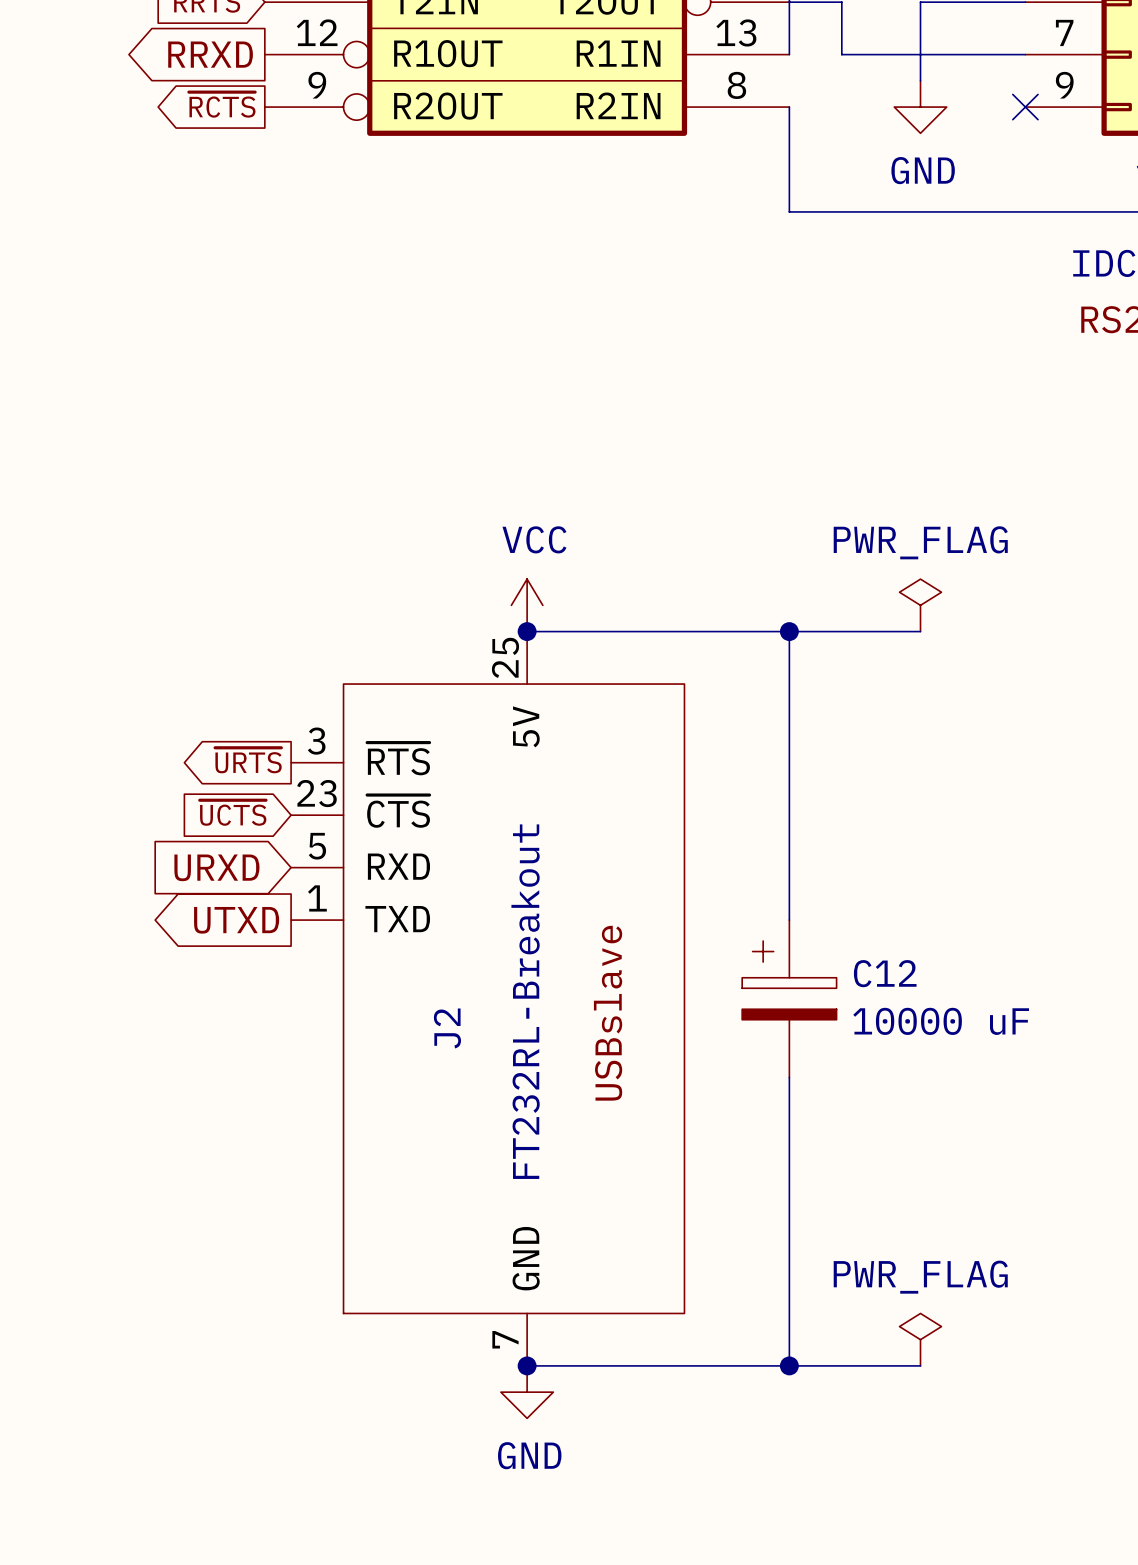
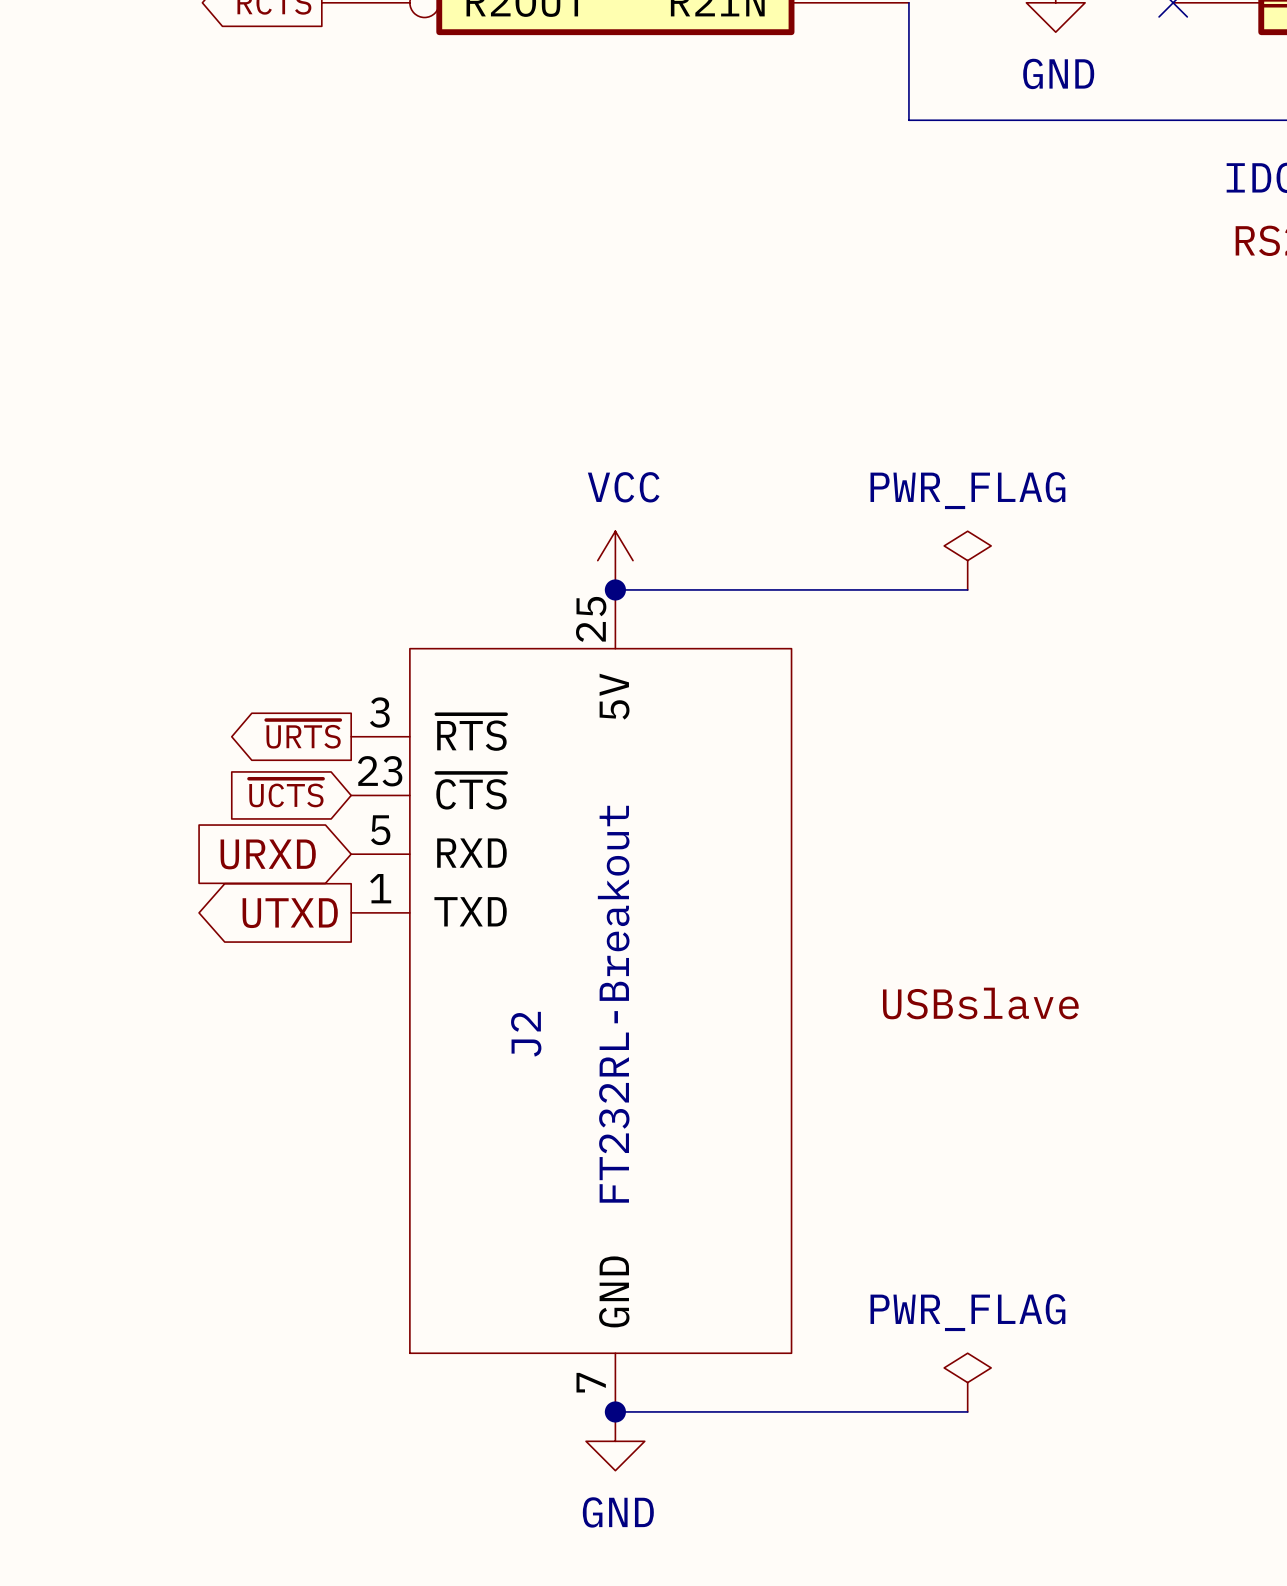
power symbol position: PWR_FLAG (920, 605) -> PWR_FLAG (967, 560)
wire: (789, 631) (789, 920) -> none
junction: (789, 631) -> none
wire: (841, 631) (920, 631) -> none
C12: 10000 uF (789, 998) -> none
label rotation: 0° (608, 1013) -> 90° clockwise (980, 1003)
label position: USBslave (608, 1013) -> USBslave (980, 1003)
wire: (789, 1077) (789, 1365) -> none
power symbol position: PWR_FLAG (920, 1339) -> PWR_FLAG (967, 1382)
junction: (789, 1365) -> none
wire: (841, 1365) (920, 1365) -> none

